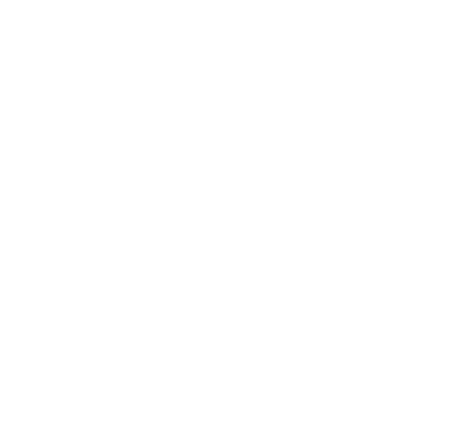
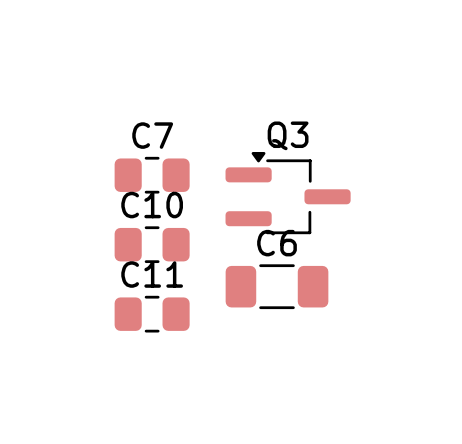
C7: none -> (152, 175)
Q3: none -> (288, 193)
C10: none -> (152, 244)
C6: none -> (277, 286)
C11: none -> (152, 314)

